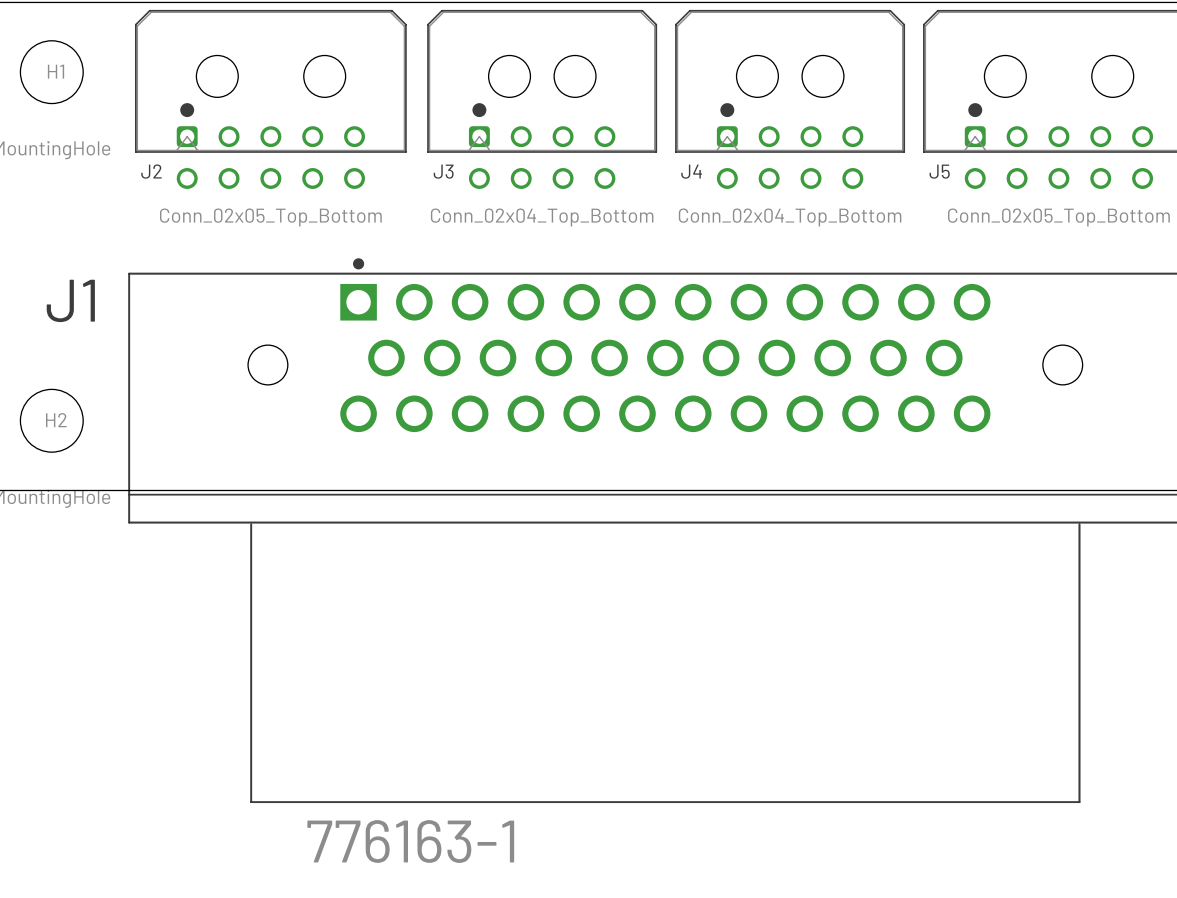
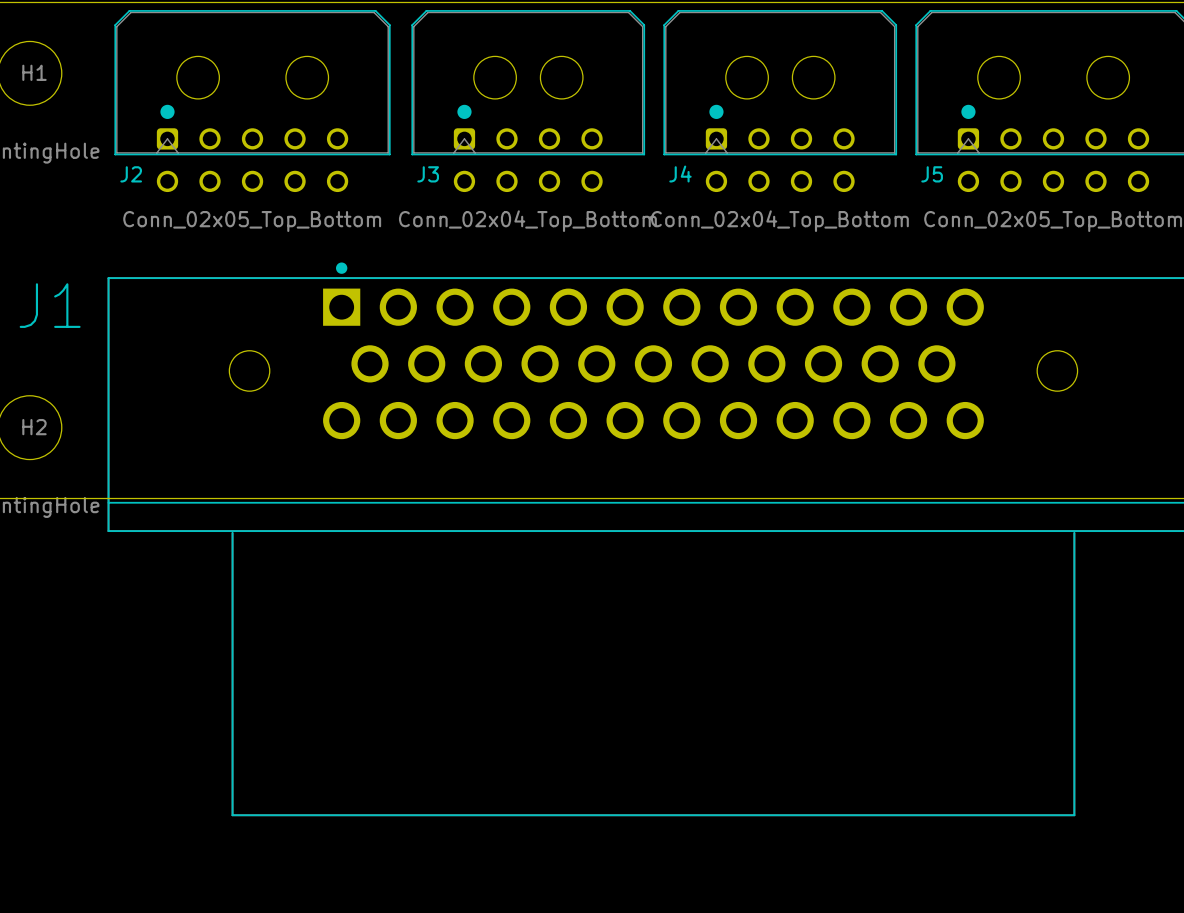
J1 value: 776163-1 (410, 841) -> none

